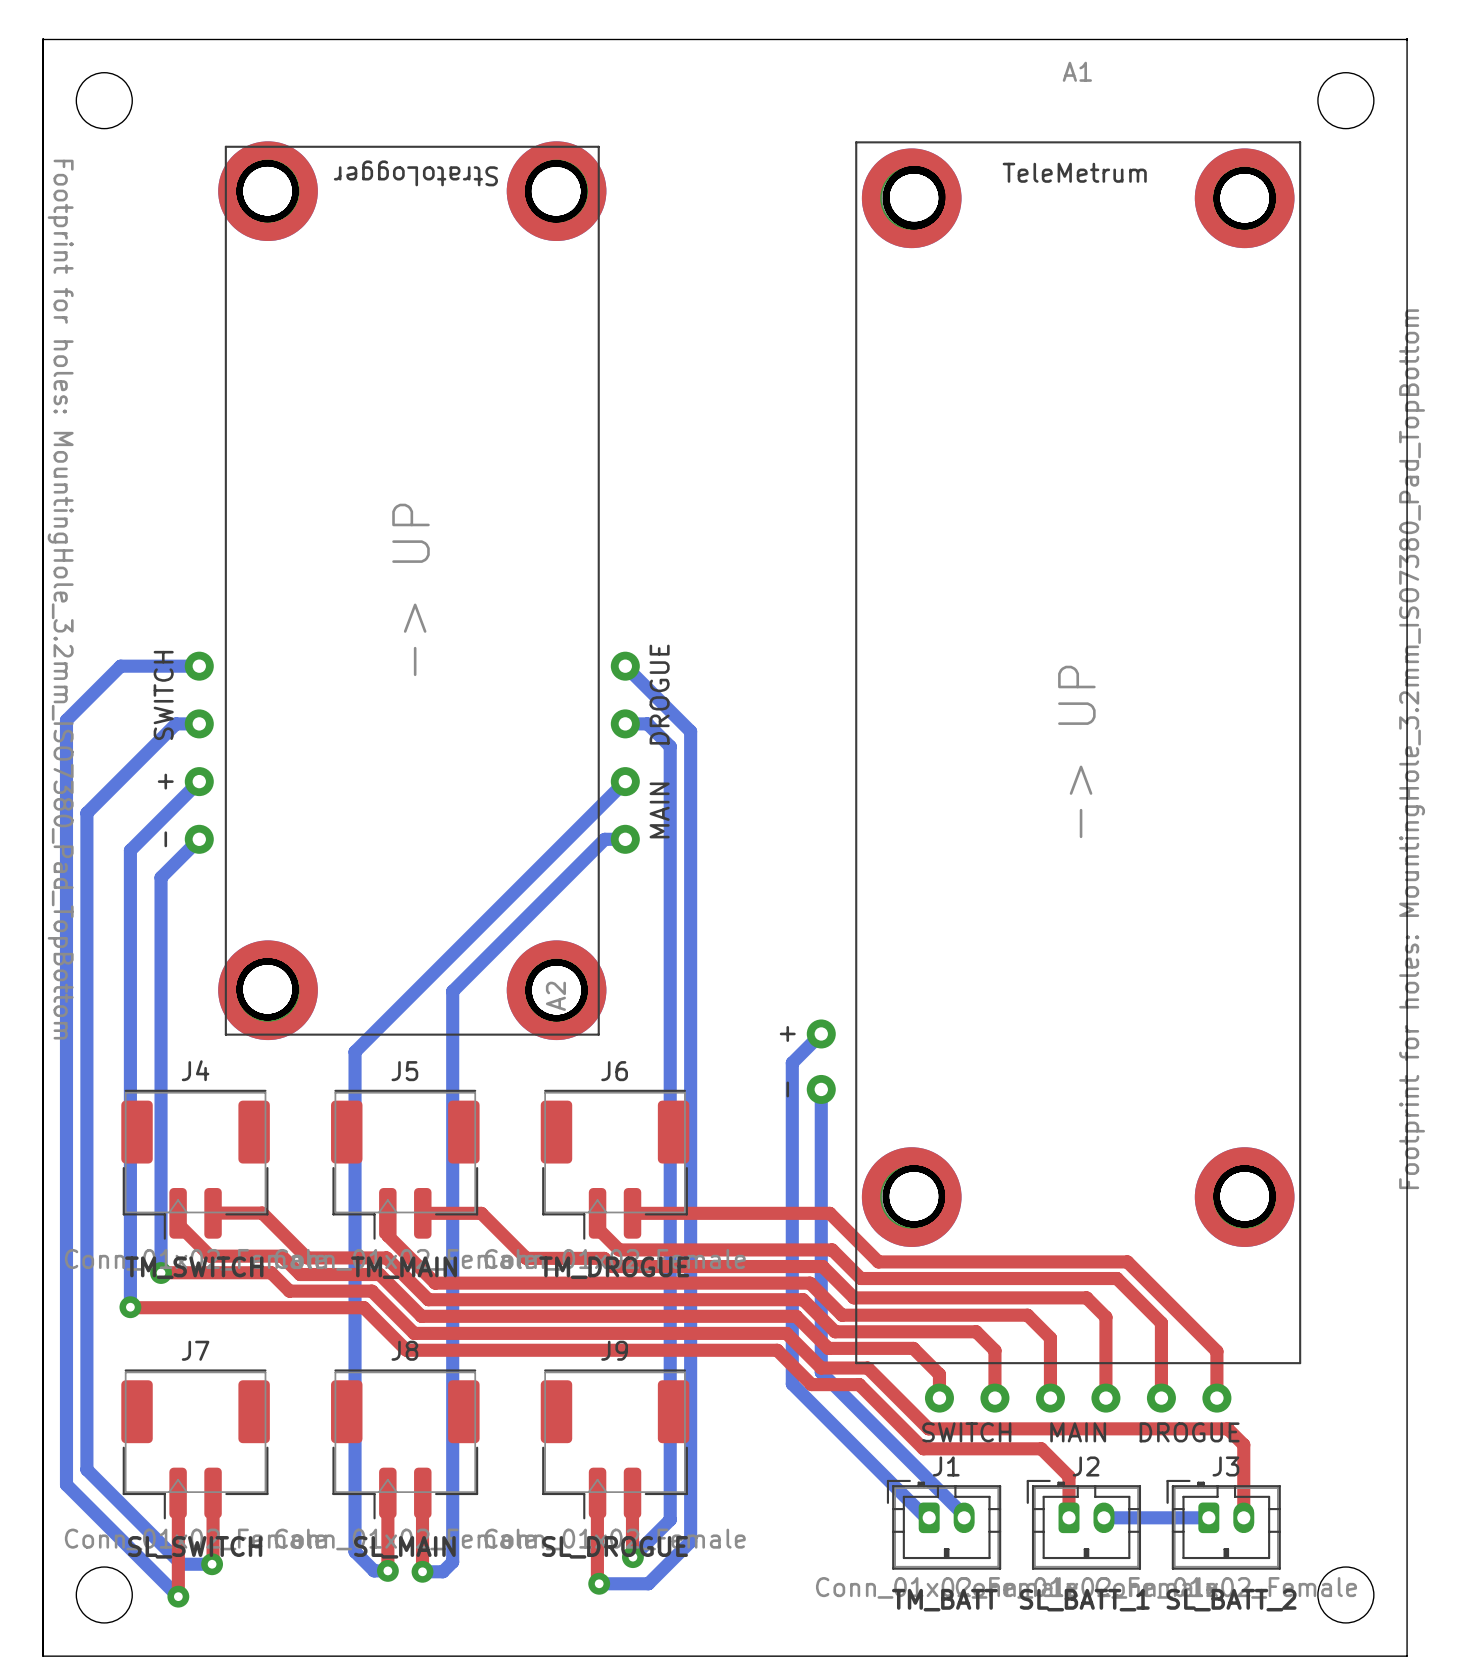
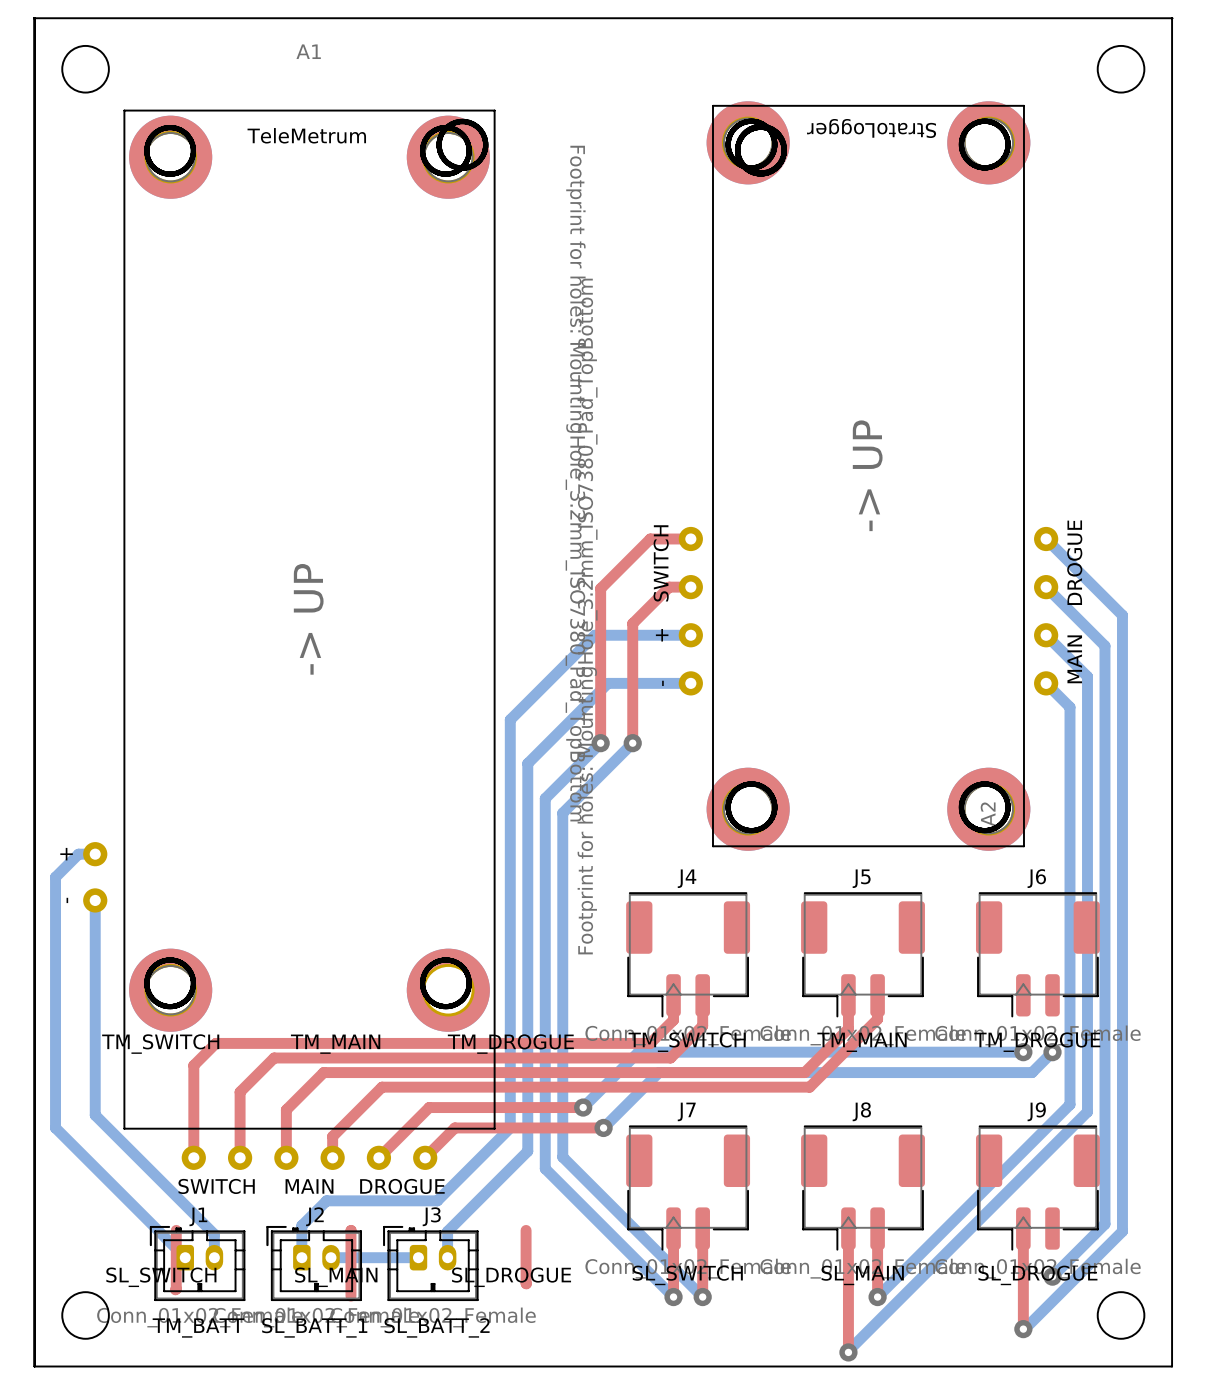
round board edge: none -> [725, 118, 778, 171]
round board edge: none -> [420, 125, 472, 177]
round board edge position: (267, 191) -> (170, 150)
round board edge position: (1244, 198) -> (984, 144)
A2 position: (412, 590) -> (868, 476)
top track: none -> (690, 538) (650, 538) (600, 588) (600, 743)
bottom track: none -> (1046, 538) (1122, 615) (1122, 1231) (1023, 1329)
bottom track: (199, 666) (120, 666) (66, 720) (66, 1484) (178, 1596) -> none
bottom track: (625, 666) (690, 731) (690, 1541) (648, 1583) (599, 1583) -> none
top track: none -> (690, 587) (669, 587) (632, 623) (632, 743)
bottom track: none -> (1046, 587) (1104, 645) (1104, 1224) (1052, 1276)
bottom track: (199, 723) (176, 723) (86, 813) (86, 1469) (181, 1564) (212, 1564) -> none
bottom track: (625, 723) (647, 723) (670, 746) (670, 1519) (632, 1557) -> none
A1 position: (1053, 776) -> (289, 639)
bottom track: none -> (690, 635) (594, 635) (510, 719) (510, 1127) (437, 1200) (326, 1200) (301, 1225) (301, 1257)
bottom track: none -> (1046, 635) (1087, 676) (1087, 1111) (848, 1352)
bottom track: (199, 781) (130, 850) (130, 1307) -> none
bottom track: (625, 781) (355, 1051) (355, 1551) (374, 1570) (387, 1570) -> none
bottom track: none -> (690, 683) (607, 683) (527, 763) (527, 1151) (447, 1231) (447, 1257)
bottom track: none -> (1046, 683) (1069, 707) (1069, 1104) (877, 1297)
bottom track: (199, 839) (161, 877) (161, 1273) -> none
bottom track: (625, 839) (604, 839) (452, 991) (452, 1562) (442, 1571) (422, 1571) -> none
bottom track: none -> (600, 743) (545, 798) (545, 1168) (673, 1297)
via: none -> (600, 743)
bottom track: none -> (632, 743) (562, 813) (562, 1157) (702, 1297)
via: none -> (632, 743)
round board edge: none -> [725, 781, 778, 834]
round board edge: none -> [958, 781, 1011, 834]
round board edge: [236, 958, 299, 1021] -> none
round board edge: [525, 959, 588, 1022] -> none
bottom track: (821, 1033) (792, 1062) (792, 1384) (926, 1517) (929, 1517) -> none
bottom track: none -> (95, 854) (78, 854) (55, 877) (55, 1127) (185, 1257)
bottom track: (821, 1089) (821, 1372) (964, 1515) (964, 1517) -> none
bottom track: none -> (95, 900) (95, 1115) (214, 1234) (214, 1257)
J4 position: (195, 1164) -> (688, 954)
J5 position: (405, 1164) -> (863, 954)
J6 position: (615, 1164) -> (1037, 954)
round board edge: none -> [144, 957, 196, 1010]
round board edge: none -> [420, 957, 472, 1010]
round board edge: [882, 1165, 946, 1228] -> none
round board edge: [1213, 1165, 1276, 1228] -> none
top track: none -> (673, 995) (673, 1020) (650, 1043) (215, 1043) (193, 1065) (193, 1157)
top track: none -> (702, 995) (702, 1025) (670, 1058) (274, 1058) (240, 1092) (240, 1157)
top track: none -> (848, 995) (848, 1028) (804, 1072) (323, 1072) (286, 1109) (286, 1157)
top track: none -> (877, 995) (877, 1019) (809, 1087) (382, 1087) (332, 1136) (332, 1157)
top track: (178, 1213) (178, 1224) (210, 1256) (281, 1256) (300, 1274) (379, 1274) (421, 1316) (796, 1316) (828, 1348) (913, 1348) (939, 1374) (939, 1398) -> none
top track: (213, 1213) (262, 1213) (307, 1257) (386, 1257) (428, 1299) (803, 1299) (835, 1331) (976, 1331) (994, 1350) (994, 1398) -> none
top track: (387, 1213) (387, 1235) (435, 1283) (809, 1283) (842, 1315) (1027, 1315) (1050, 1338) (1050, 1398) -> none
top track: (597, 1213) (597, 1228) (619, 1249) (832, 1249) (860, 1278) (1116, 1278) (1161, 1322) (1161, 1398) -> none
top track: (632, 1213) (829, 1213) (878, 1261) (1127, 1261) (1216, 1351) (1216, 1398) -> none
top track: (422, 1216) (422, 1213) (481, 1213) (526, 1258) (604, 1258) (612, 1266) (822, 1266) (854, 1297) (1086, 1297) (1105, 1317) (1105, 1398) -> none
text: none -> TM_SWITCH (687, 1042)
text: none -> TM_MAIN (862, 1042)
text: none -> TM_DROGUE (1037, 1042)
top track: (161, 1273) (271, 1272) (289, 1291) (371, 1291) (414, 1333) (786, 1333) (821, 1368) (867, 1368) (928, 1428) (1227, 1428) (1243, 1444) (1243, 1517) -> none
via: (161, 1273) -> none
bottom track: none -> (1023, 1052) (638, 1052) (583, 1107)
via: none -> (1023, 1052)
bottom track: none -> (1052, 1052) (1032, 1072) (658, 1072) (603, 1127)
via: none -> (1052, 1052)
top track: (130, 1307) (363, 1307) (406, 1350) (777, 1350) (811, 1384) (859, 1384) (923, 1448) (1041, 1448) (1069, 1476) (1069, 1517) -> none
via: (130, 1307) -> none
top track: none -> (583, 1107) (429, 1107) (378, 1157)
via: none -> (583, 1107)
top track: none -> (603, 1127) (454, 1127) (425, 1157)
via: none -> (603, 1127)
J7 position: (195, 1444) -> (688, 1188)
J8 position: (405, 1444) -> (863, 1188)
J9 position: (615, 1444) -> (1037, 1188)
top track: none -> (673, 1228) (673, 1297)
top track: none -> (702, 1228) (702, 1297)
top track: none -> (848, 1228) (848, 1352)
top track: none -> (877, 1228) (877, 1297)
top track: none -> (1023, 1228) (1023, 1329)
top track: (178, 1492) (178, 1596) -> none
top track: (387, 1493) (387, 1570) -> none
top track: (597, 1493) (597, 1582) (599, 1583) -> none
bottom track: (1103, 1517) (1208, 1517) -> none
J1 position: (944, 1524) -> (197, 1263)
J2 position: (1083, 1524) -> (314, 1263)
J3 position: (1223, 1524) -> (430, 1263)
bottom track: none -> (331, 1257) (418, 1257)
text: none -> SL_SWITCH (687, 1275)
text: none -> SL_MAIN (862, 1275)
text: none -> SL_DROGUE (1037, 1275)
via: none -> (1052, 1276)
via: (632, 1557) -> none
via: (212, 1564) -> none
via: (387, 1570) -> none
via: (422, 1571) -> none
via: none -> (673, 1297)
via: none -> (702, 1297)
via: none -> (877, 1297)
via: (599, 1583) -> none
via: (178, 1596) -> none
text: TM_BATT (944, 1600) -> none
text: SL_BATT_1 (1084, 1600) -> none
text: SL_BATT_2 (1231, 1600) -> none
text: none -> TM_BATT (198, 1328)
text: none -> SL_BATT_1 (314, 1327)
text: none -> SL_BATT_2 (437, 1327)
via: none -> (1023, 1329)
via: none -> (848, 1352)

